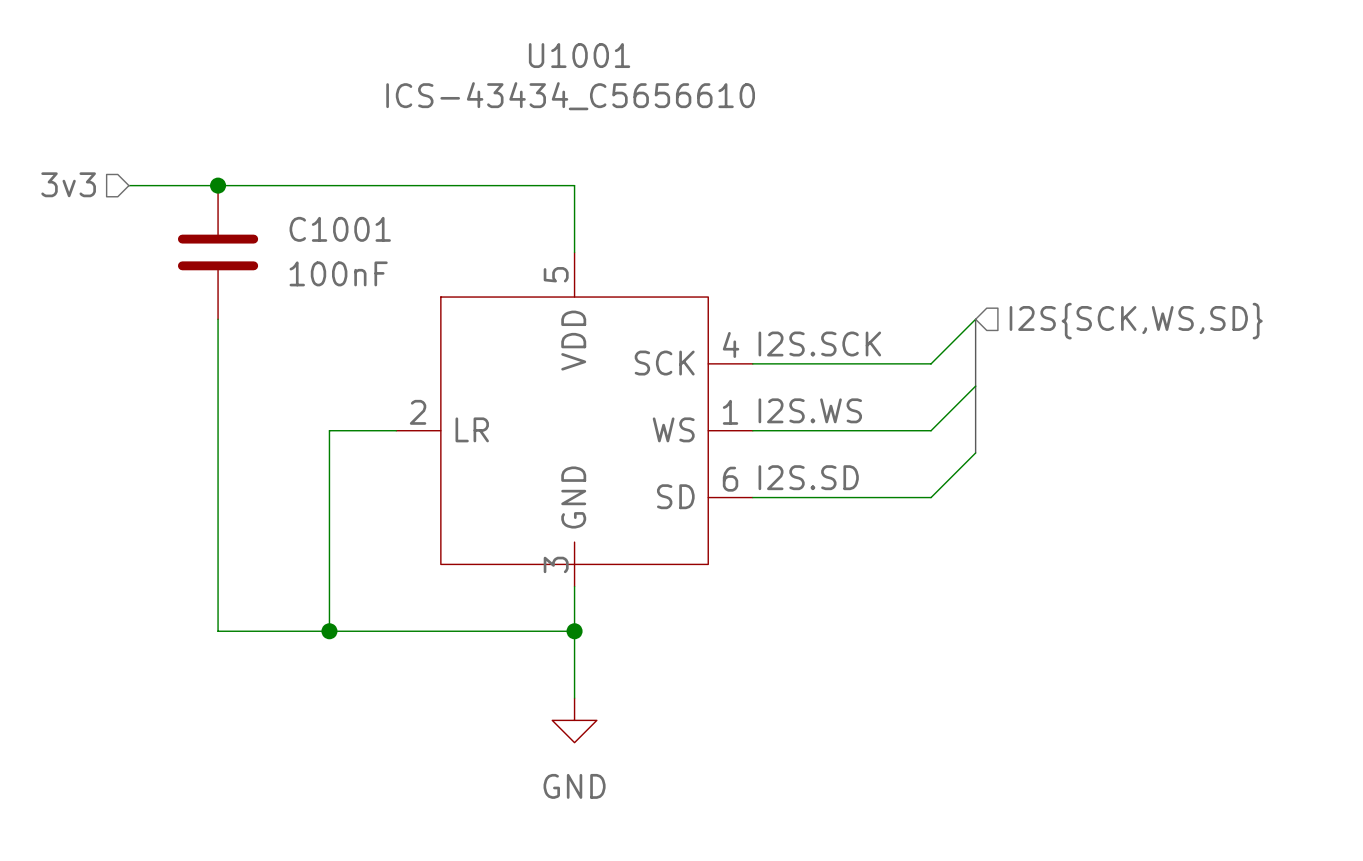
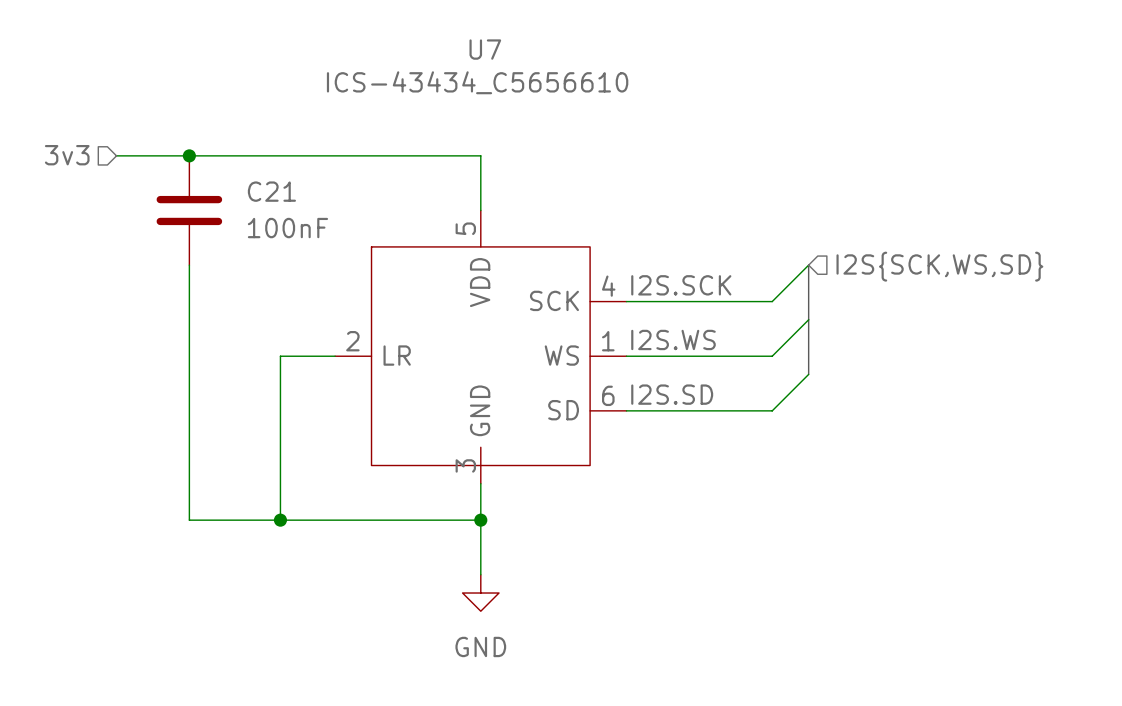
U1001 name: U1001 (579, 55) -> U7 (485, 49)
C1001 name: C1001 (340, 229) -> C21 (271, 191)

